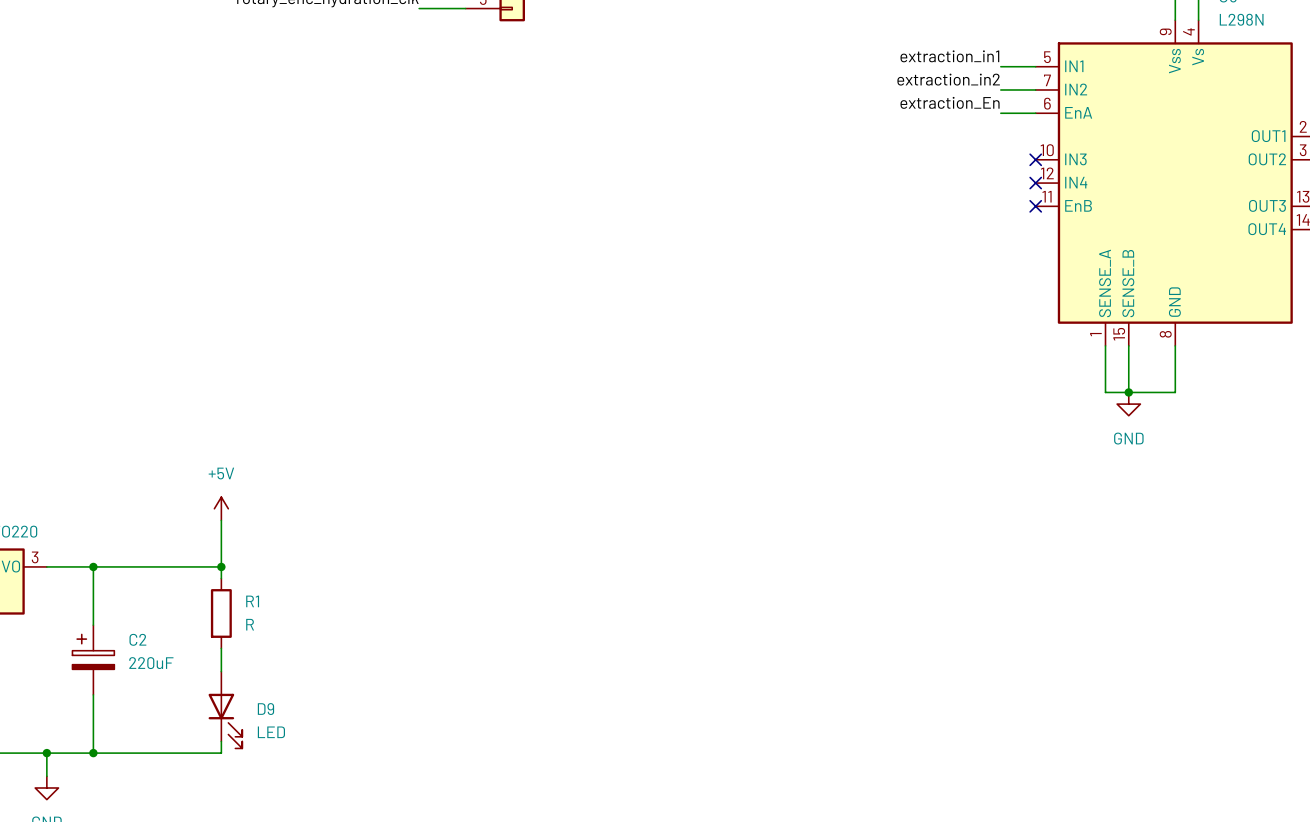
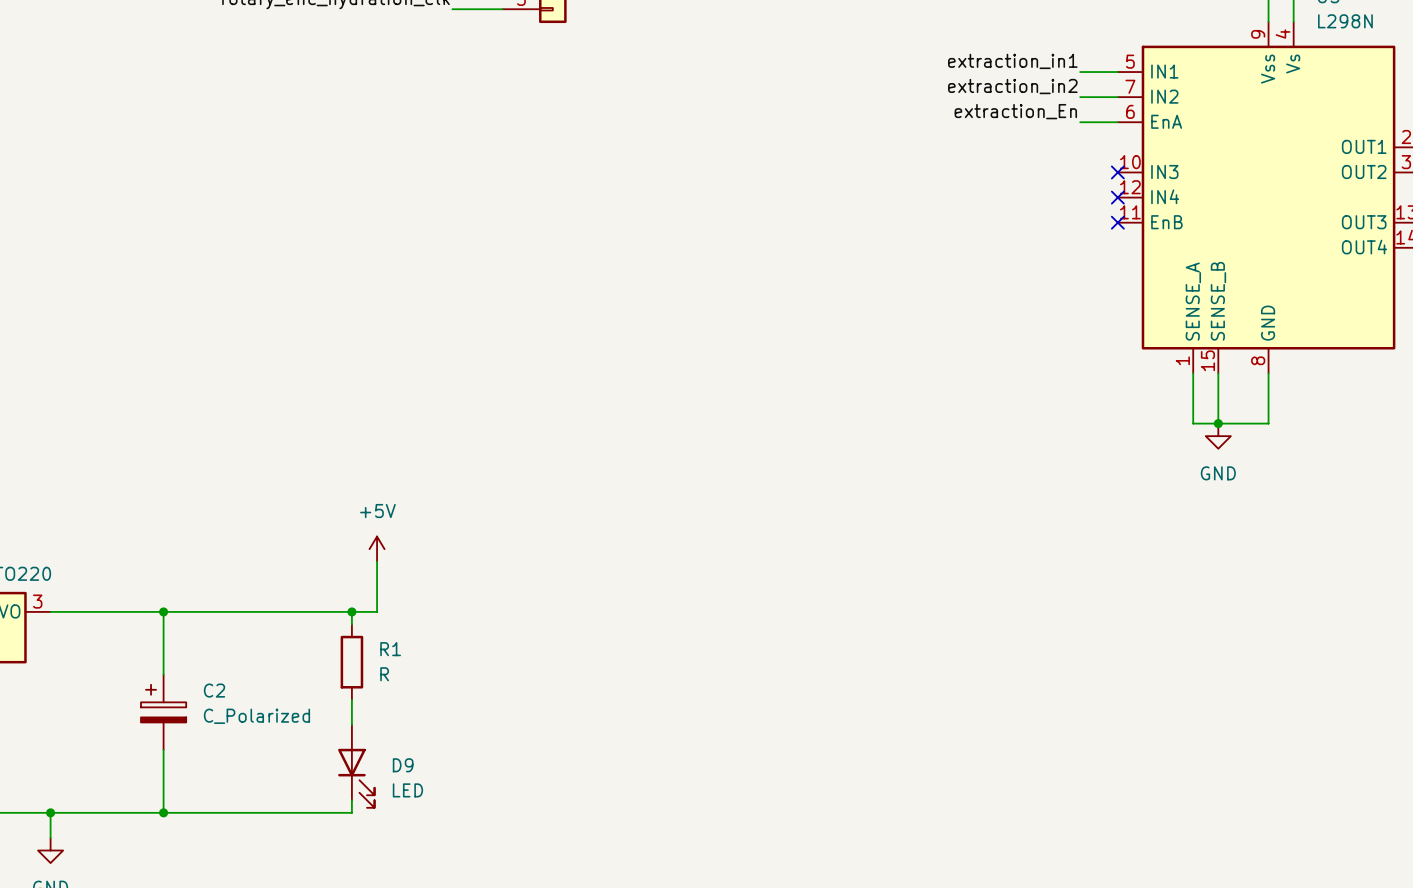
power symbol position: +5V (221, 508) -> +5V (377, 549)
wire: (221, 520) (221, 578) -> none
wire: none -> (377, 561) (377, 611) (238, 611)
wire: (93, 566) (93, 625) -> (163, 611) (163, 674)
junction: (93, 566) -> none
junction: none -> (163, 611)
junction: (221, 566) -> none
wire: none -> (351, 611) (351, 624)
junction: none -> (351, 611)
R1 position: (221, 613) -> (351, 662)
wire: (221, 648) (221, 671) -> (351, 699) (351, 724)
C2 position: (93, 660) -> (163, 712)
C2 value: 220uF (151, 663) -> C_Polarized (256, 716)
wire: (93, 694) (93, 753) -> (163, 750) (163, 812)
D9 position: (225, 710) -> (356, 766)
wire: (221, 741) (221, 753) -> (351, 800) (351, 812) (238, 812)
junction: (93, 753) -> none
junction: none -> (163, 812)

